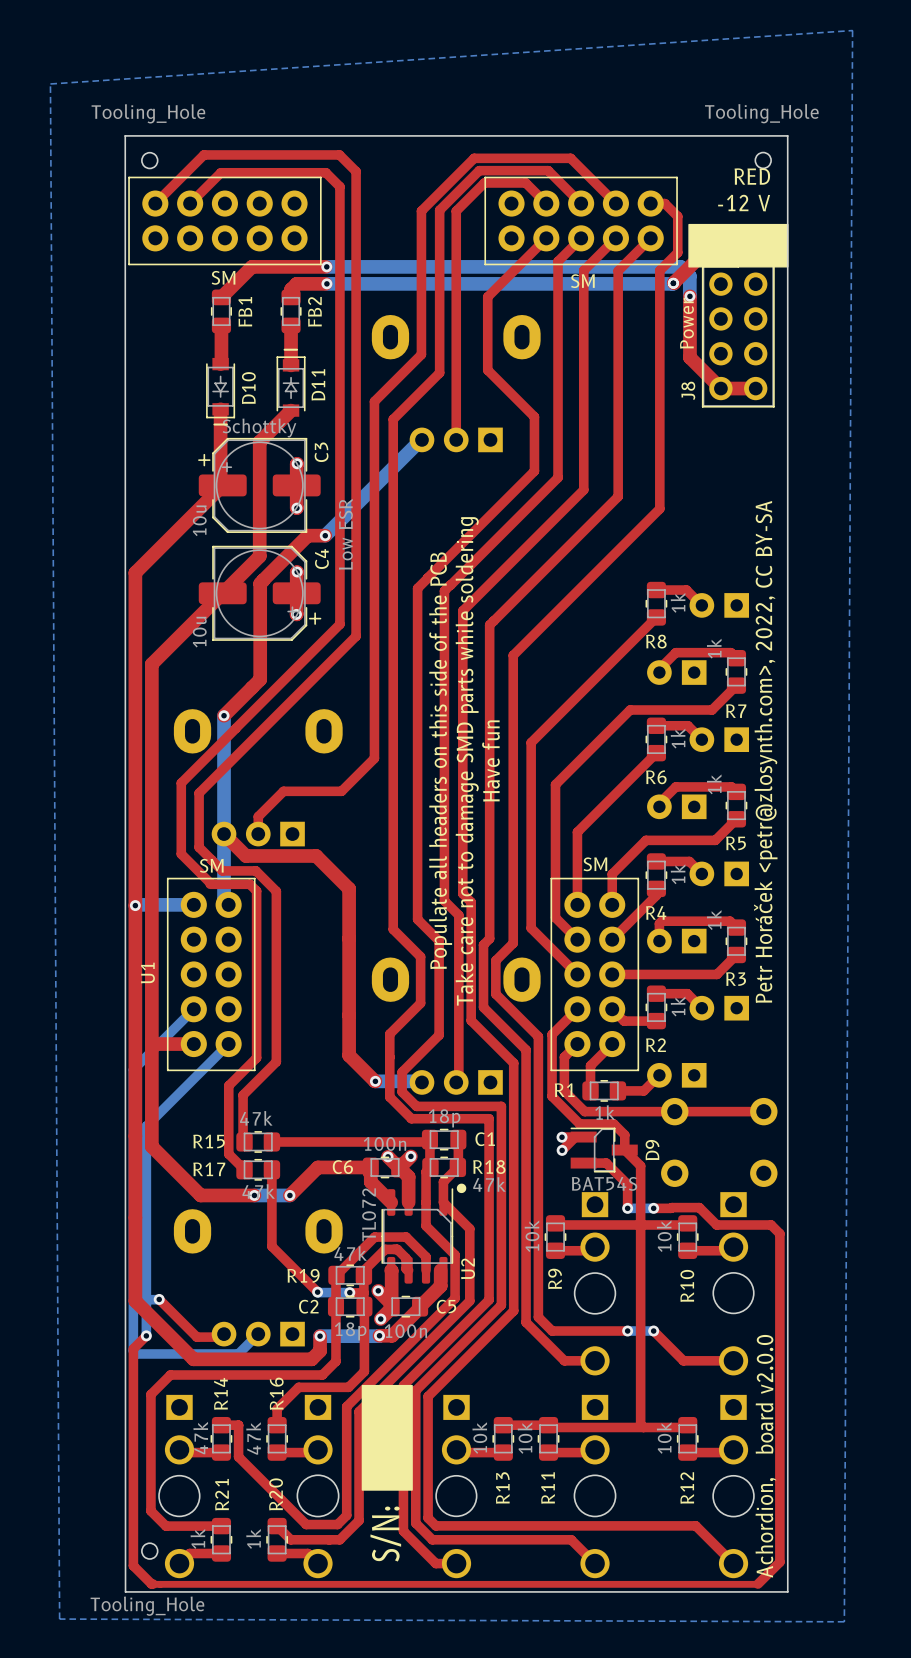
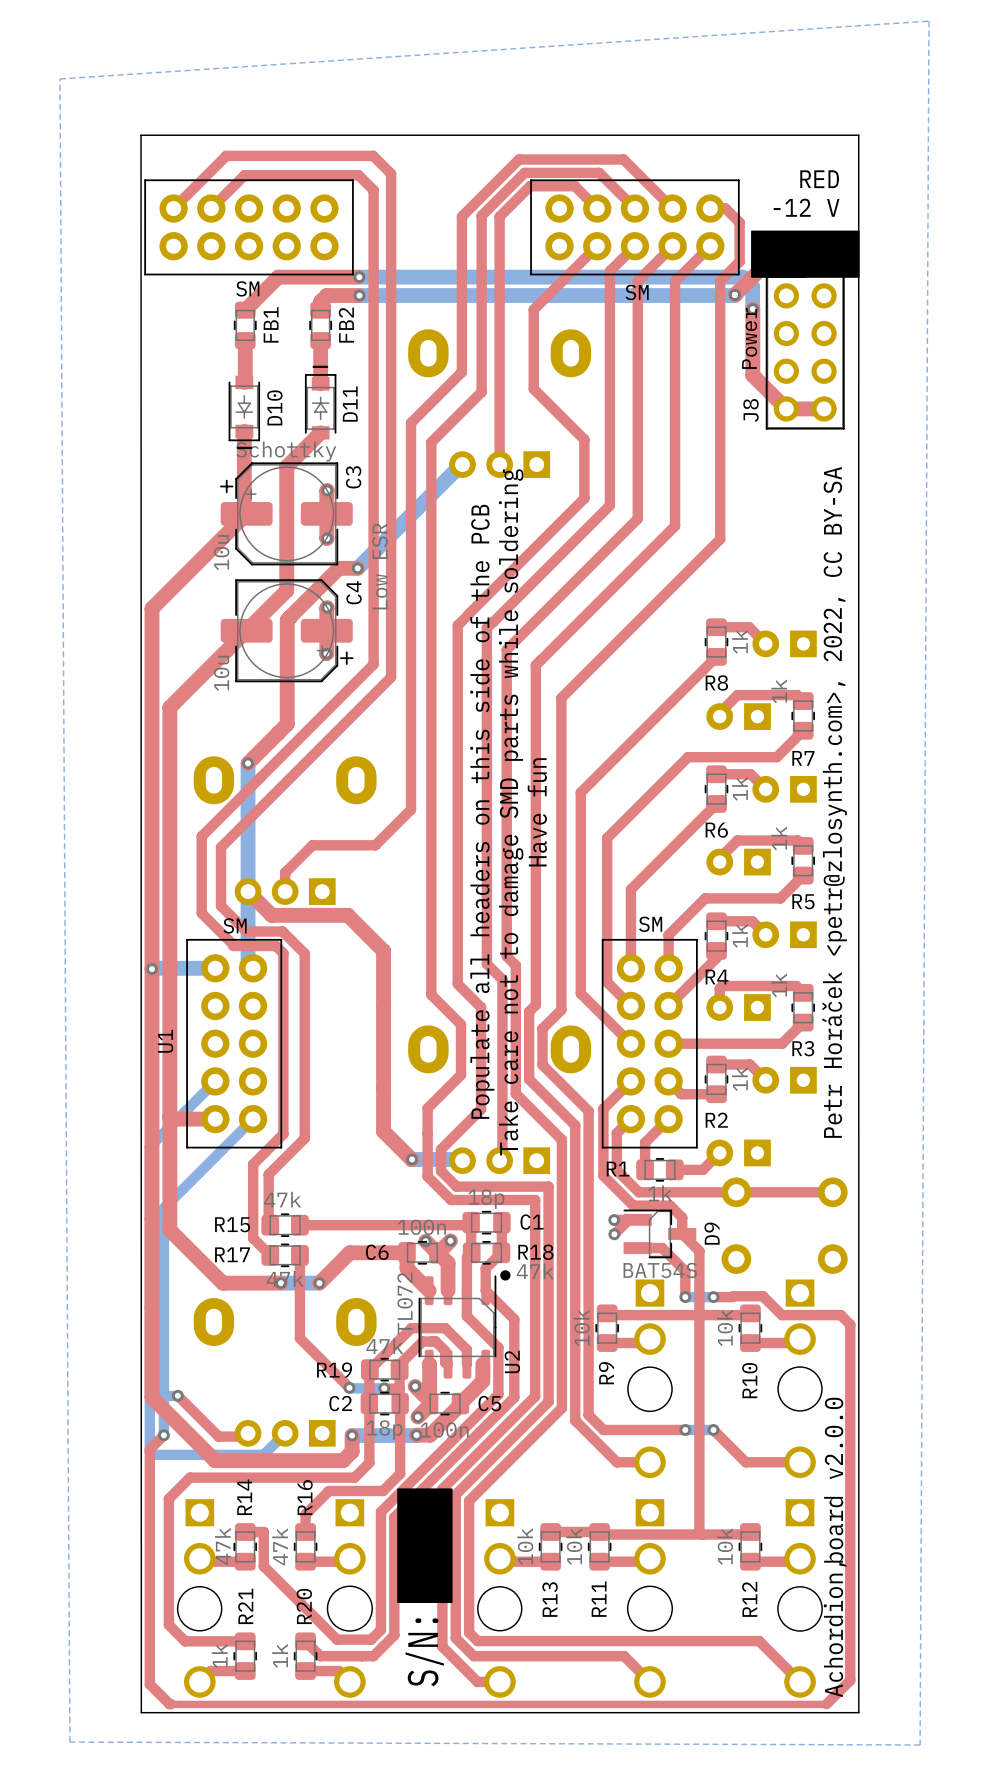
part: Tooling_Hole (149, 160) -> none
part: Tooling_Hole (763, 160) -> none
part: Tooling_Hole (149, 1551) -> none

